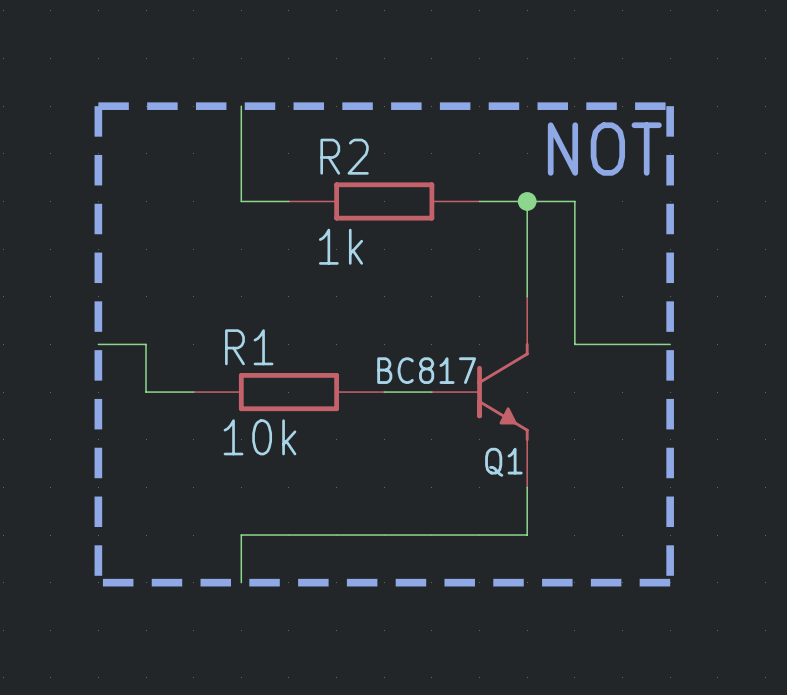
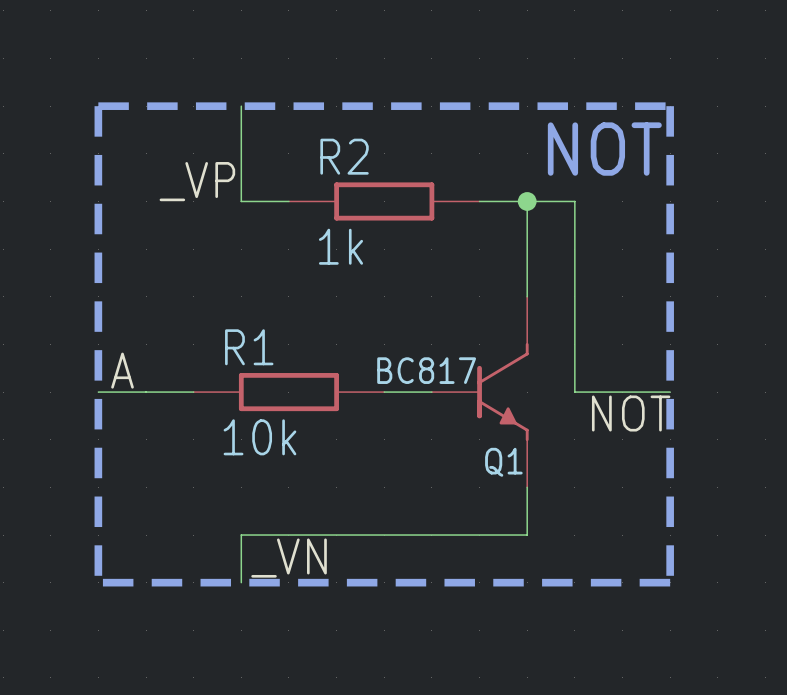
label: none -> _VP (197, 181)
wire: (98, 344) (146, 344) (146, 392) -> (98, 392) (146, 392)
wire: (574, 344) (670, 344) -> (574, 344) (574, 392) (670, 392)
label: none -> A (122, 370)
label: none -> NOT (631, 413)
label: none -> _VN (289, 558)

